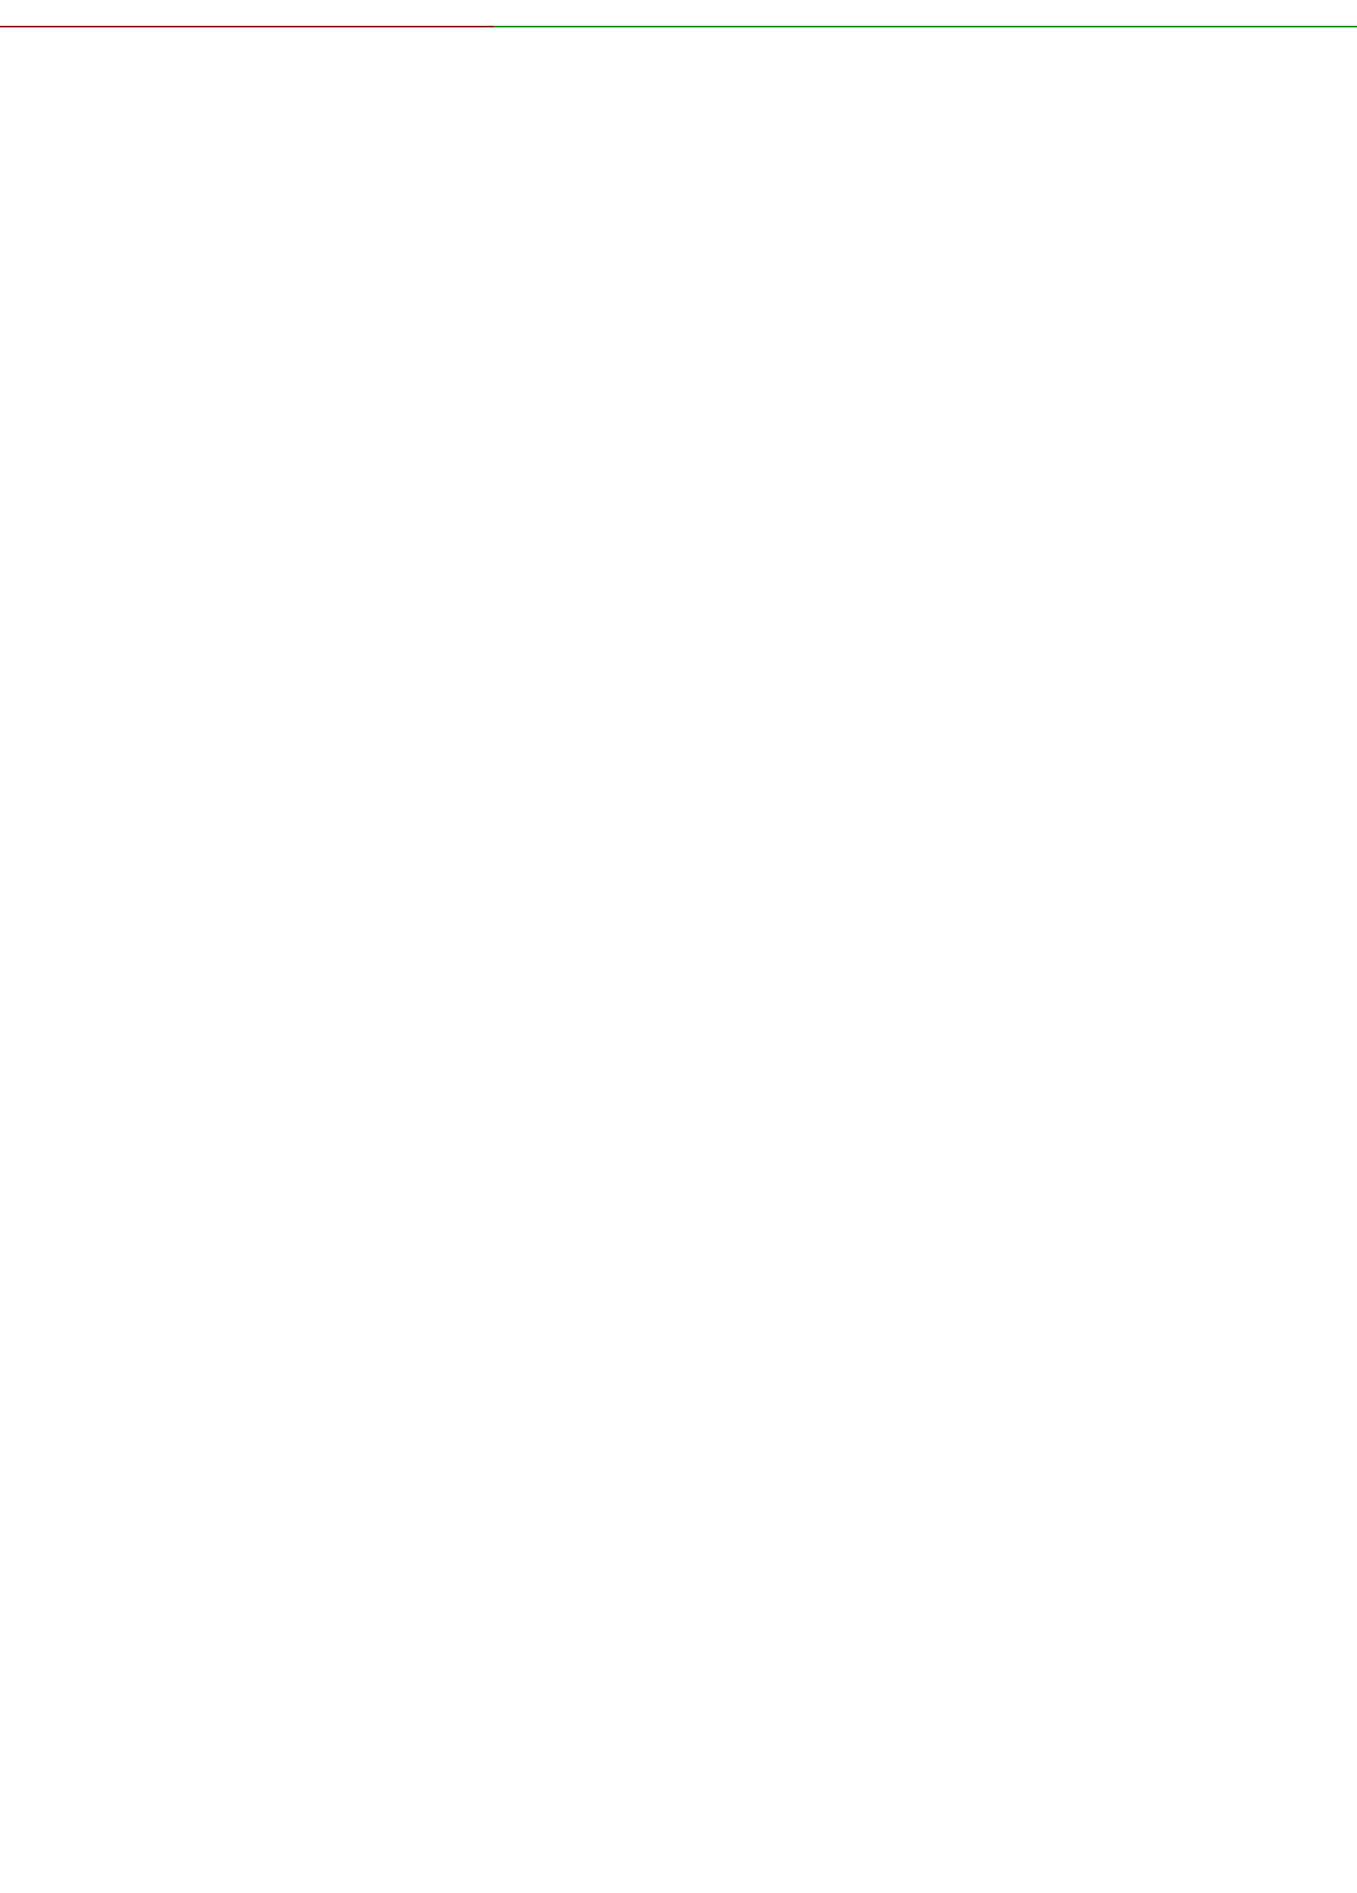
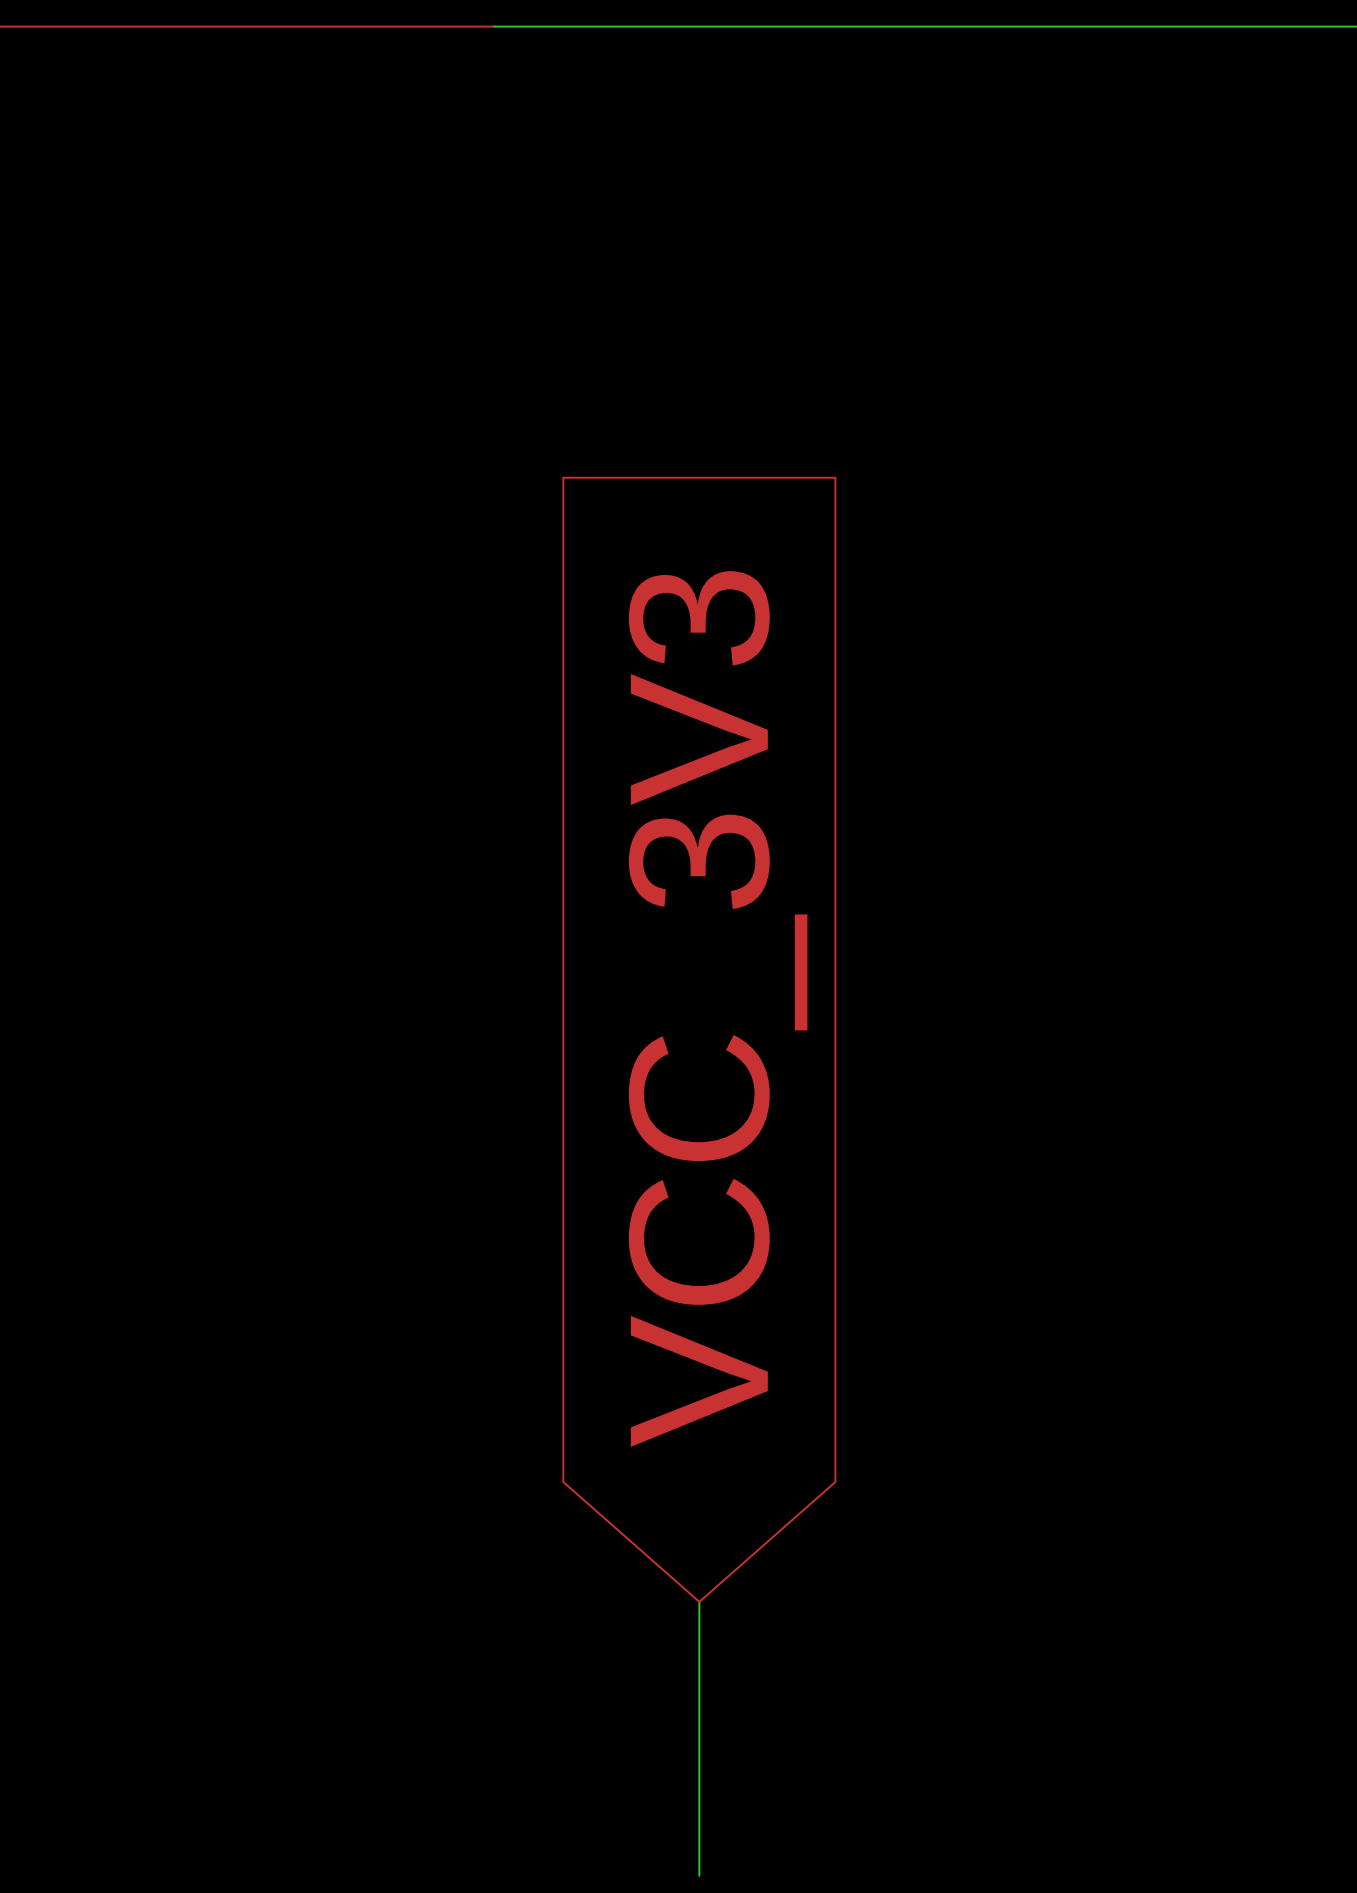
global label: none -> VCC_3V3 (718, 1009)
wire: none -> (699, 1601) (699, 1875)

